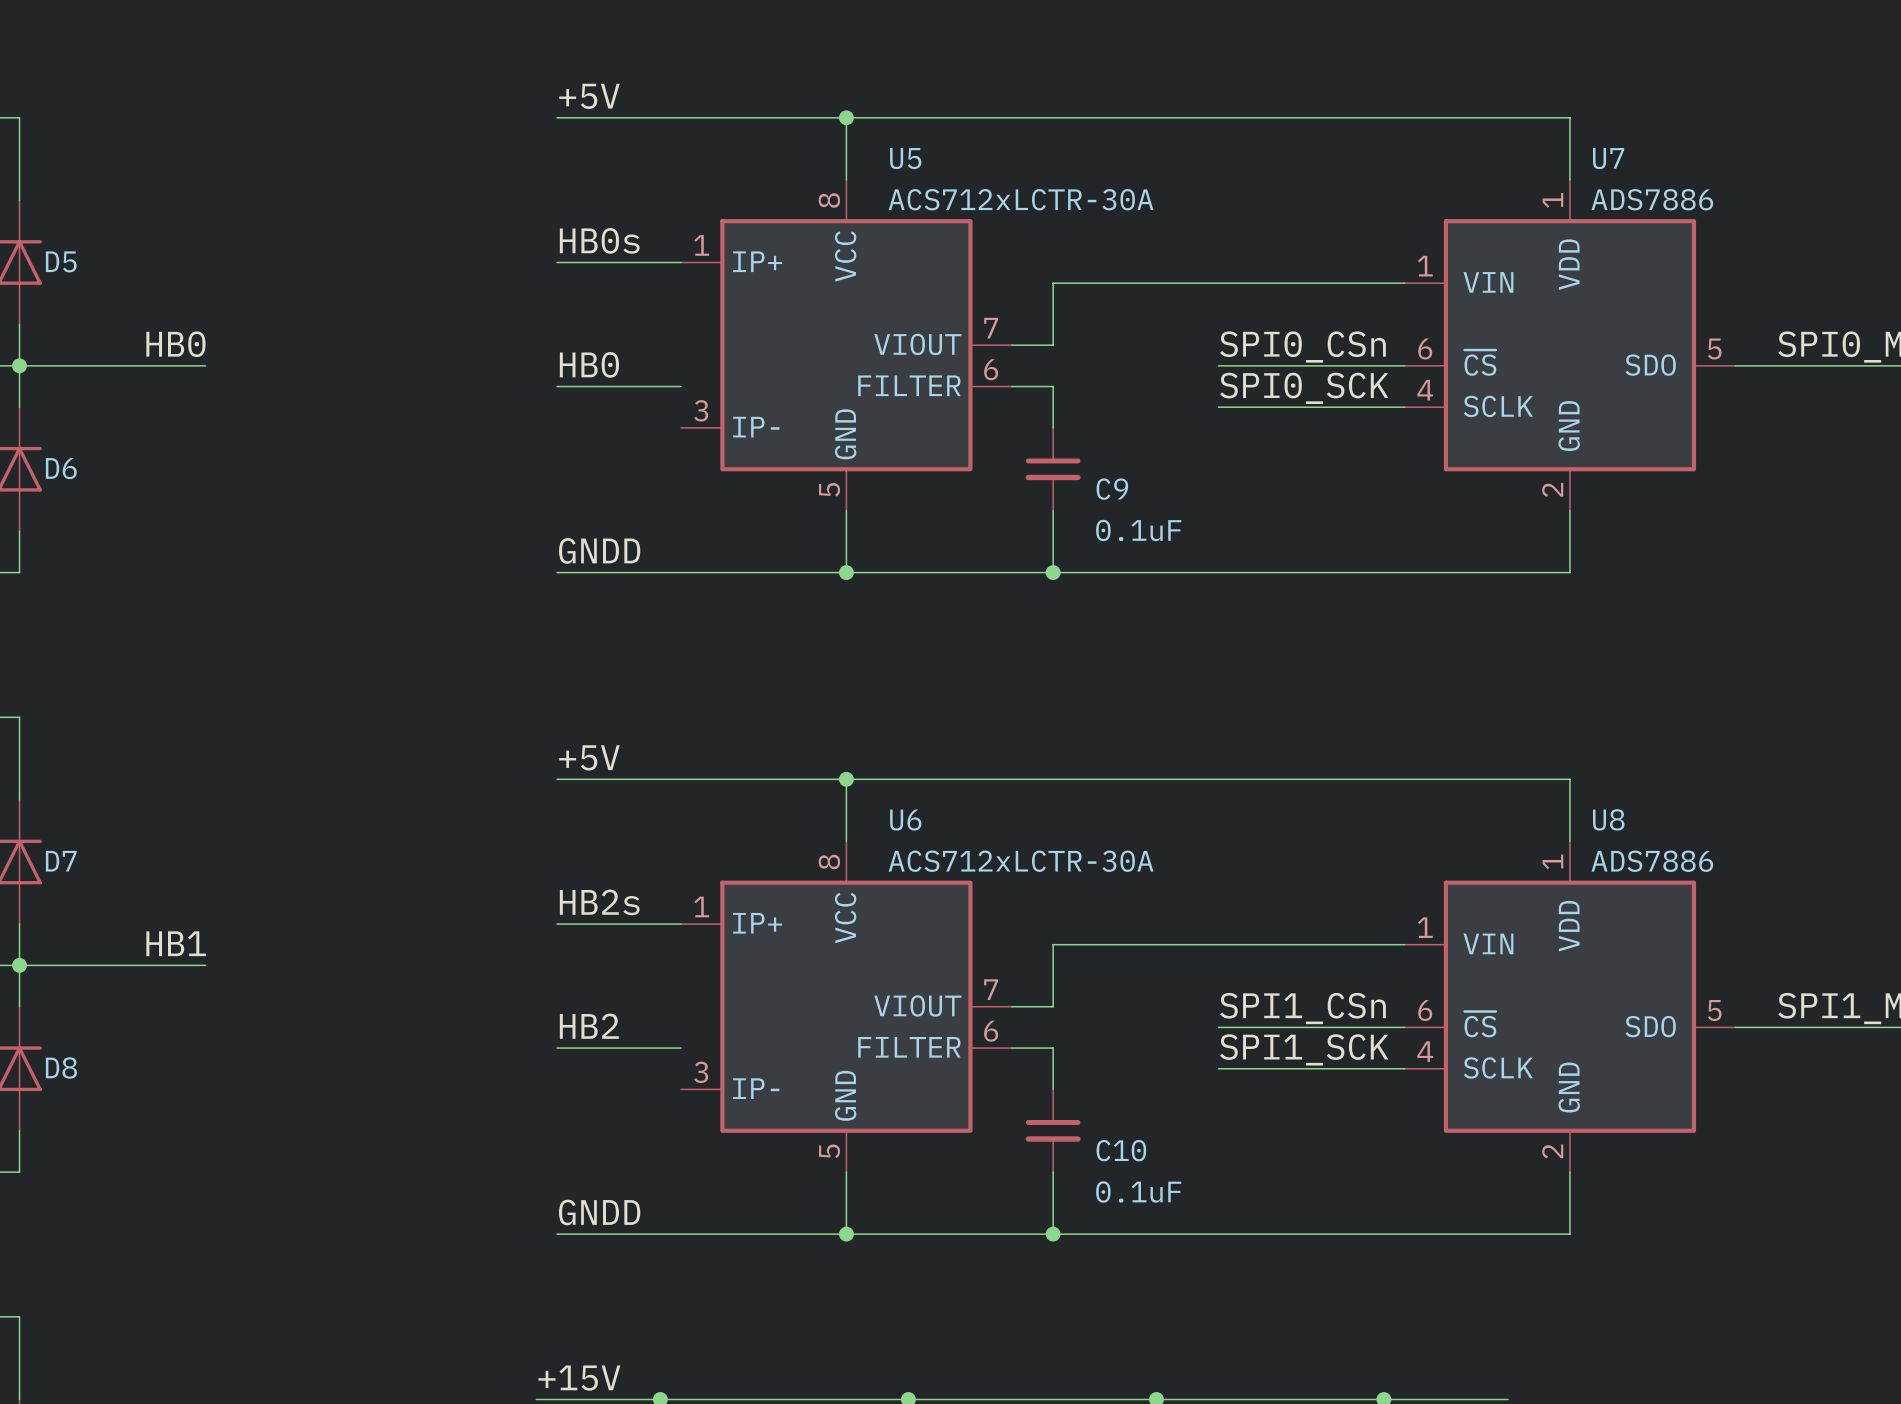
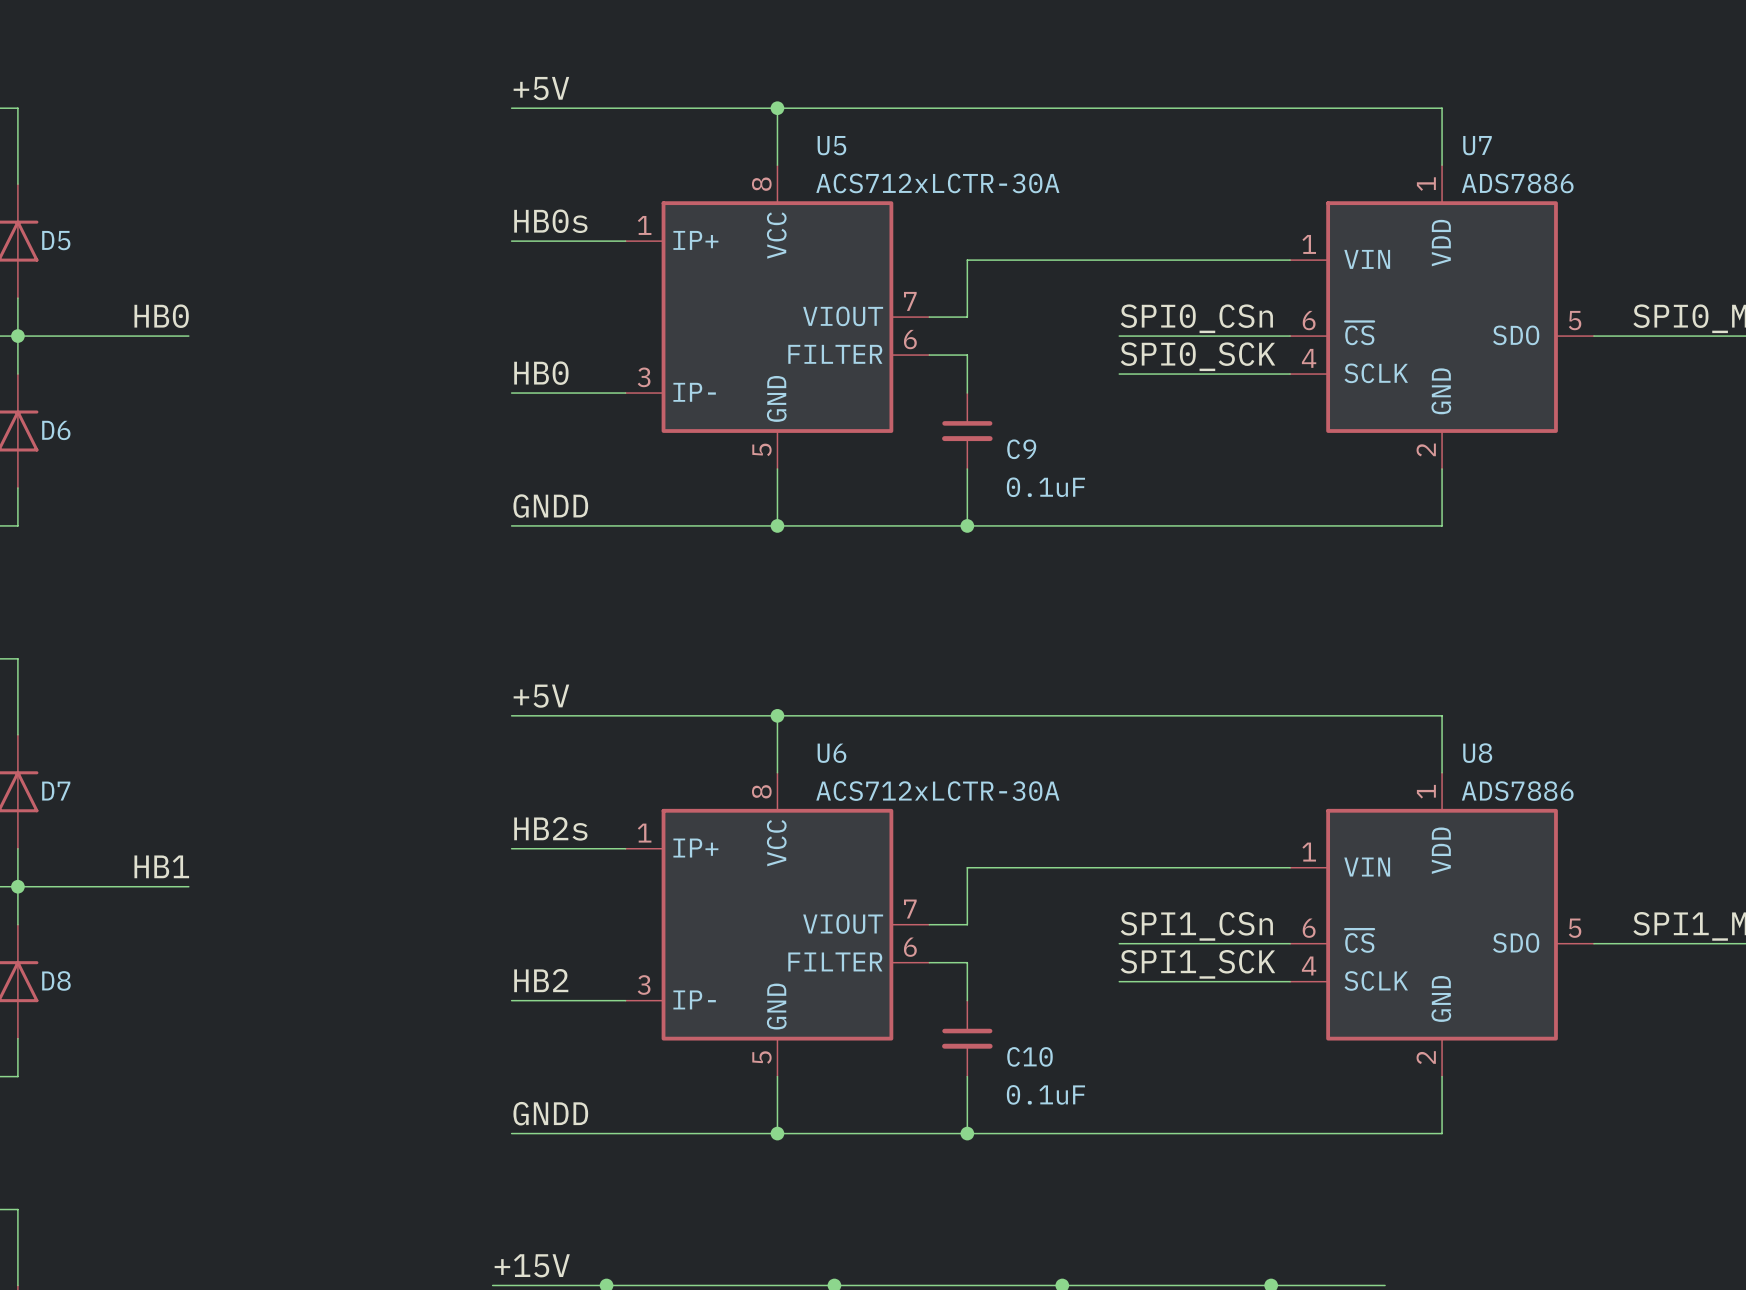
label position: HB0 (589, 364) -> HB0 (541, 373)
wire: (557, 386) (681, 386) -> (511, 393) (625, 393)
label position: HB2 (589, 1026) -> HB2 (541, 980)
wire: (557, 1048) (681, 1048) -> (511, 1000) (625, 1000)

